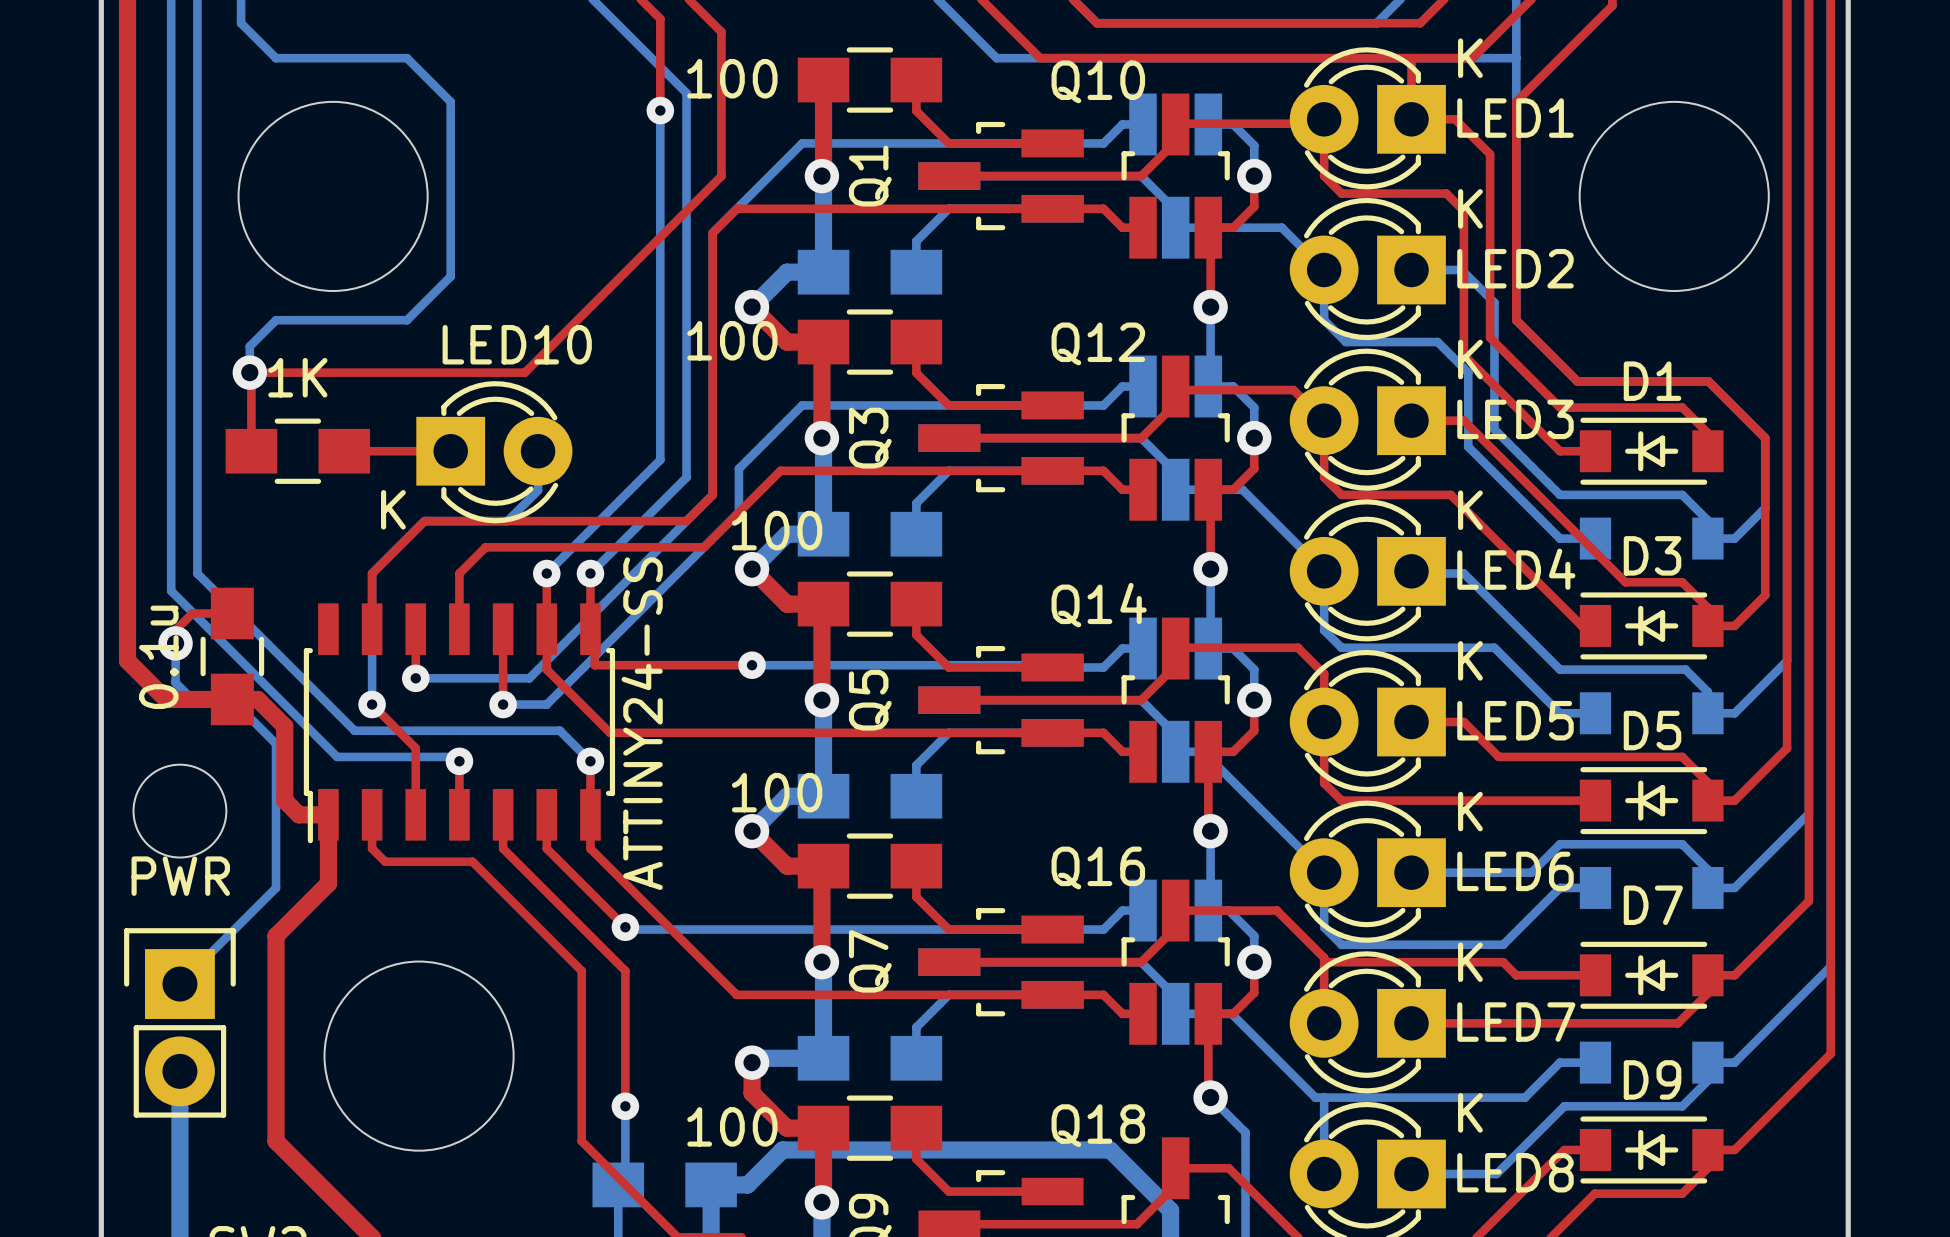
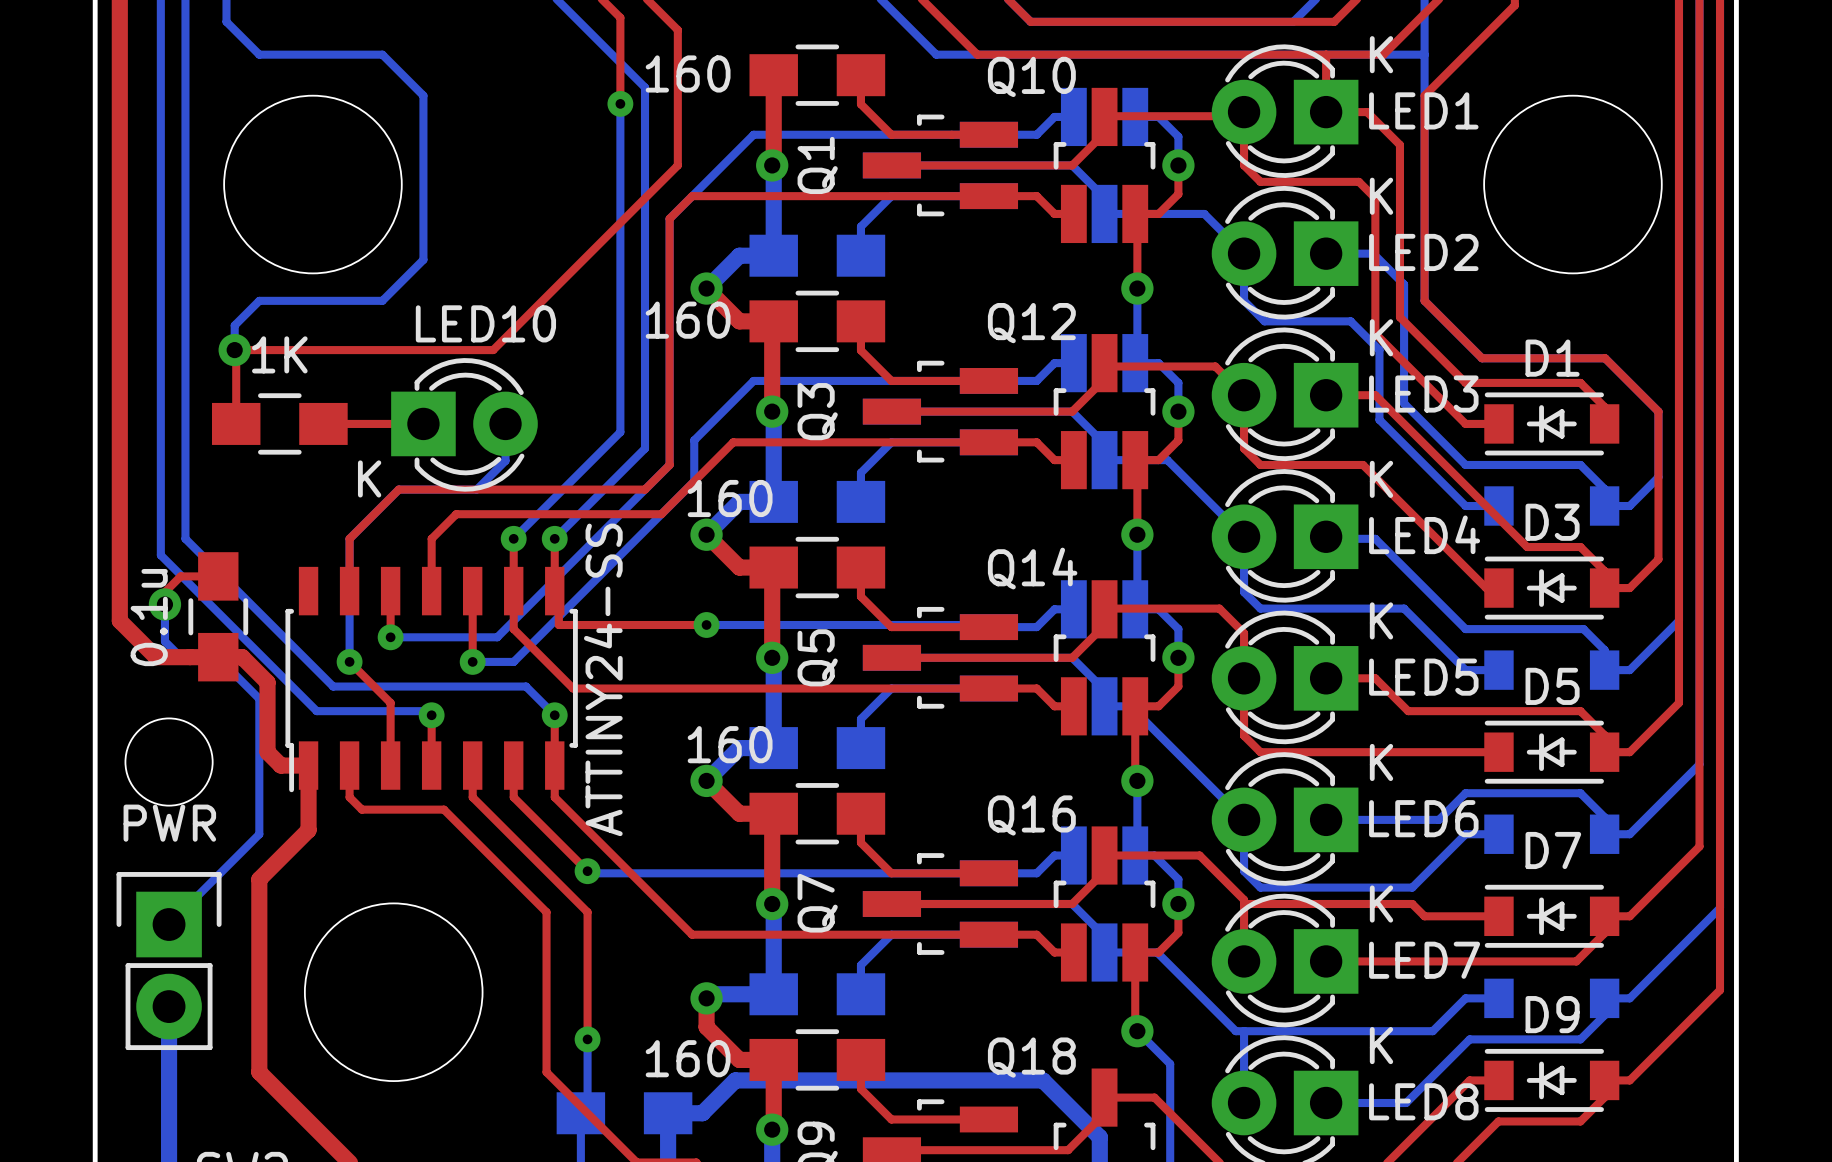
part value: 100 (732, 78) -> 160 (688, 73)
part value: 100 (732, 340) -> 160 (688, 320)
part value: 100 (777, 530) -> 160 (730, 498)
part value: 100 (777, 792) -> 160 (730, 744)
part value: 100 (732, 1126) -> 160 (688, 1058)

